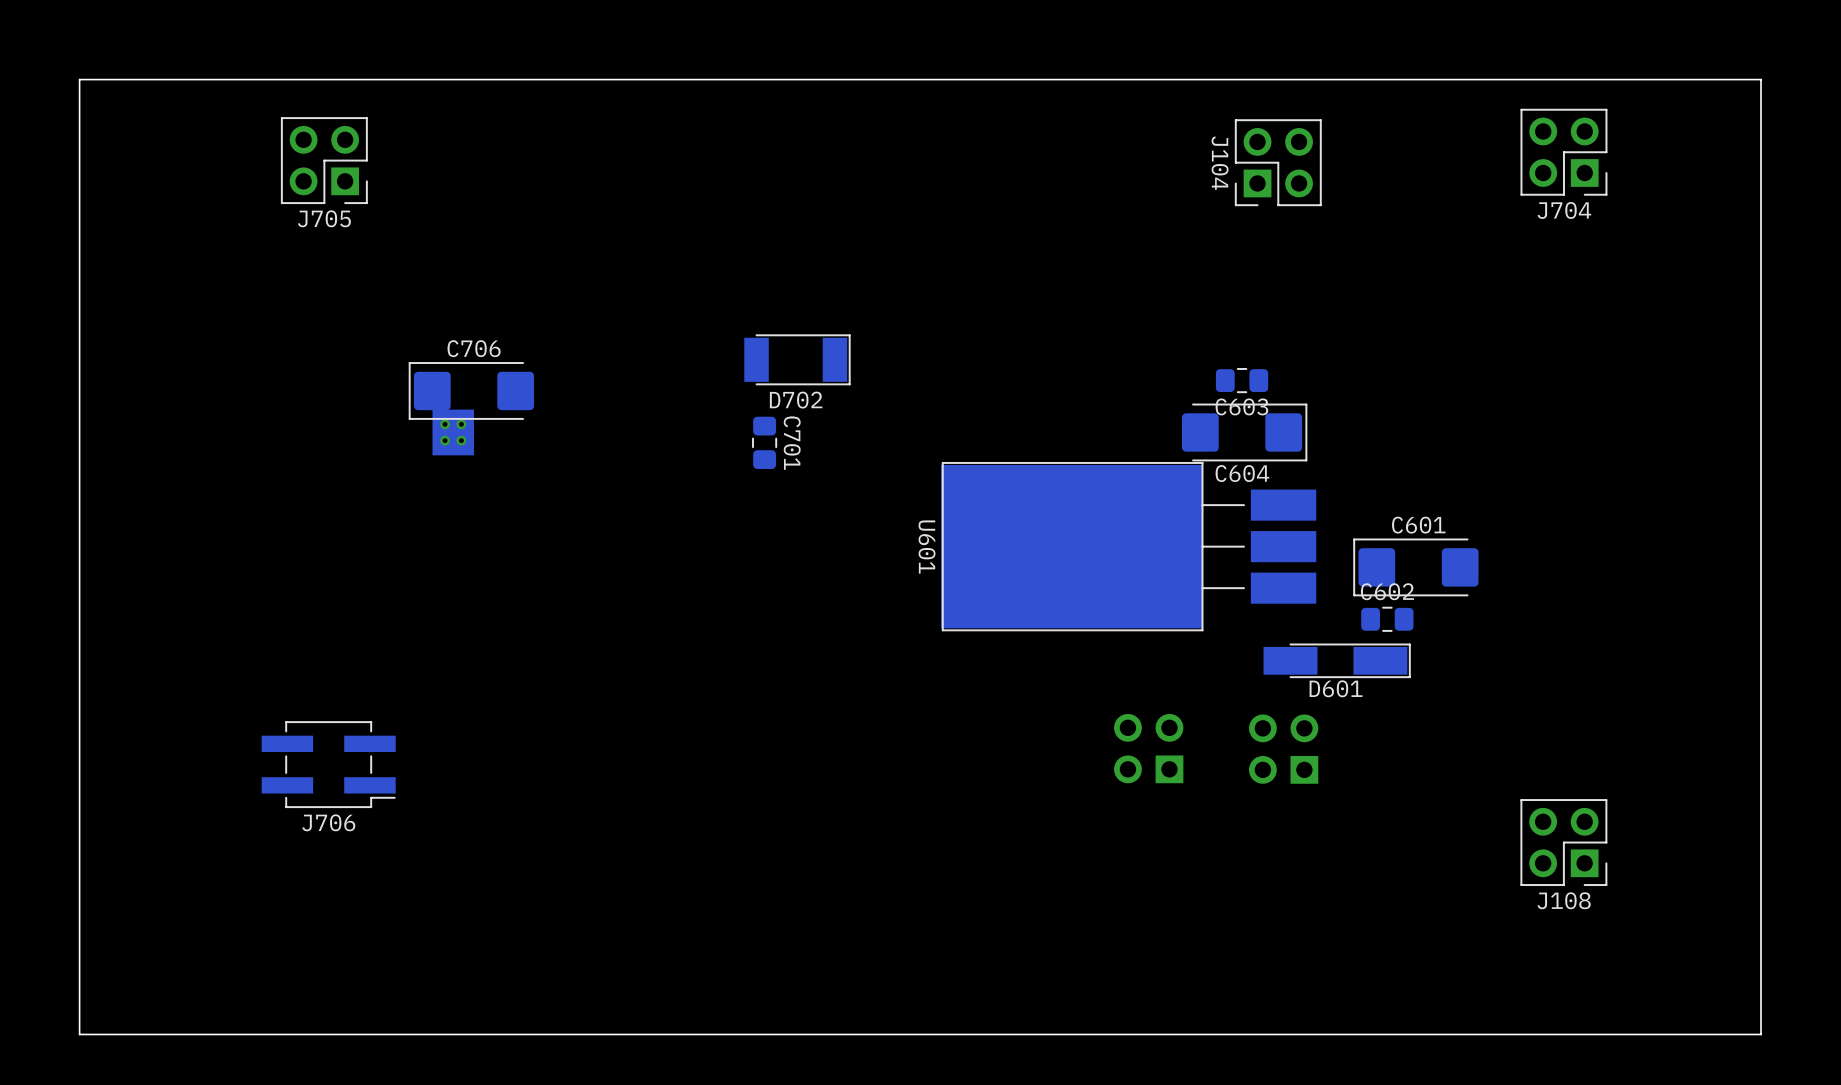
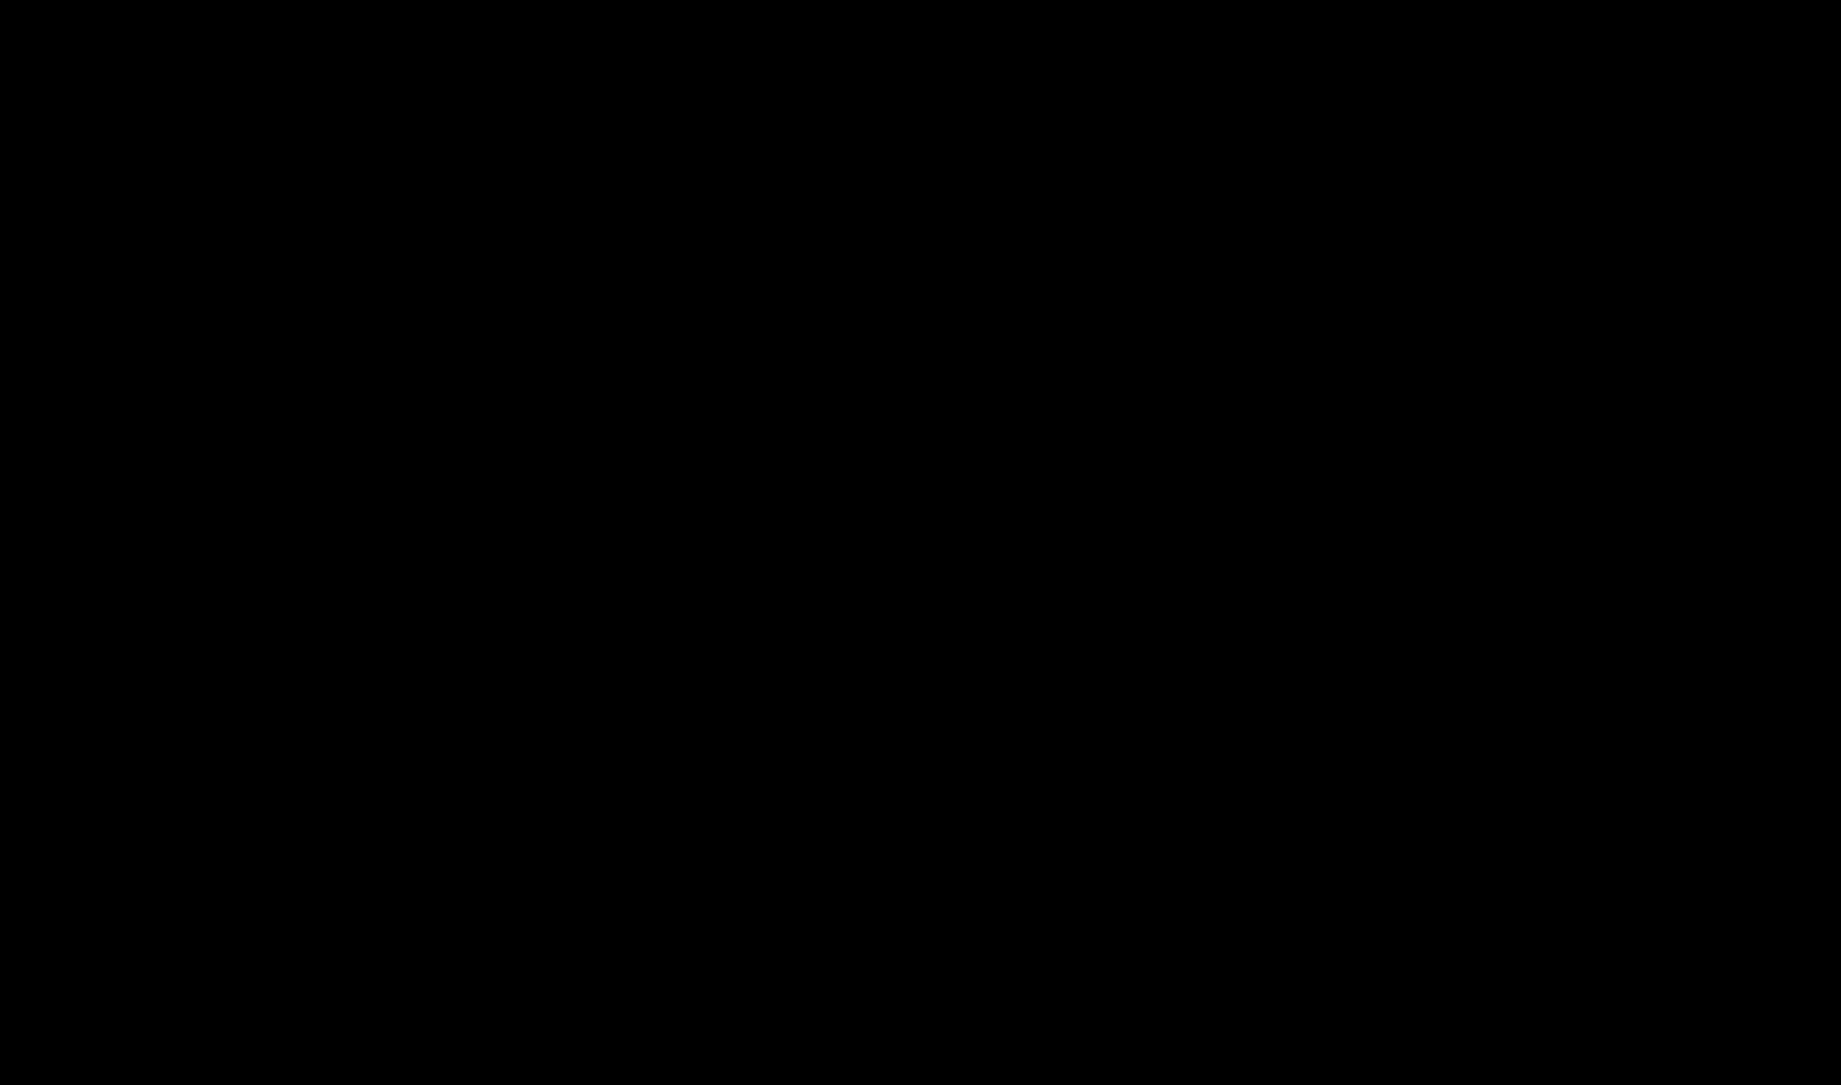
board edge: (1761, 79) (79, 79) (79, 1034) (1761, 1034) (1761, 79) -> none
J704: (1563, 152) -> none
J705: (324, 160) -> none
J104: (1278, 162) -> none
D702: (797, 359) -> none
C603: (1242, 380) -> none
C706: (471, 390) -> none
part: (453, 432) -> none
C604: (1244, 432) -> none
C701: (764, 442) -> none
U601: (1128, 546) -> none
C601: (1415, 567) -> none
C602: (1387, 619) -> none
D601: (1337, 660) -> none
part: (1148, 748) -> none
part: (1283, 749) -> none
J706: (328, 764) -> none
J108: (1563, 842) -> none

